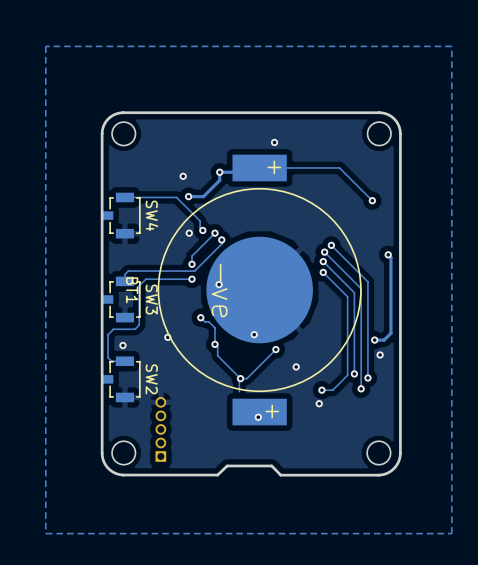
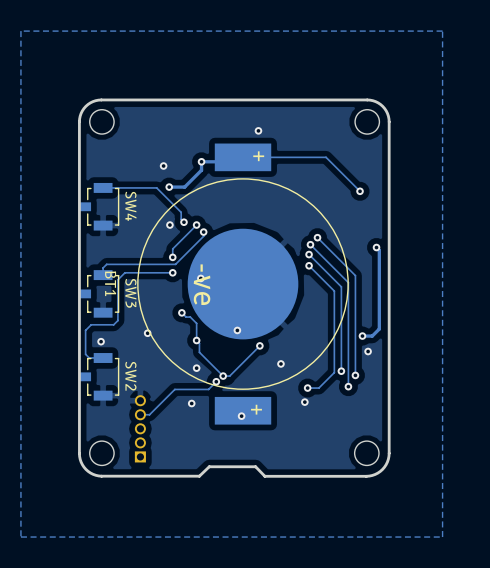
via: none -> (196, 368)
track: (240, 378) (239, 391) -> none
track: none -> (216, 381) (208, 389) (174, 389) (149, 414) (140, 414)
via: none -> (216, 381)
via: none -> (191, 403)

